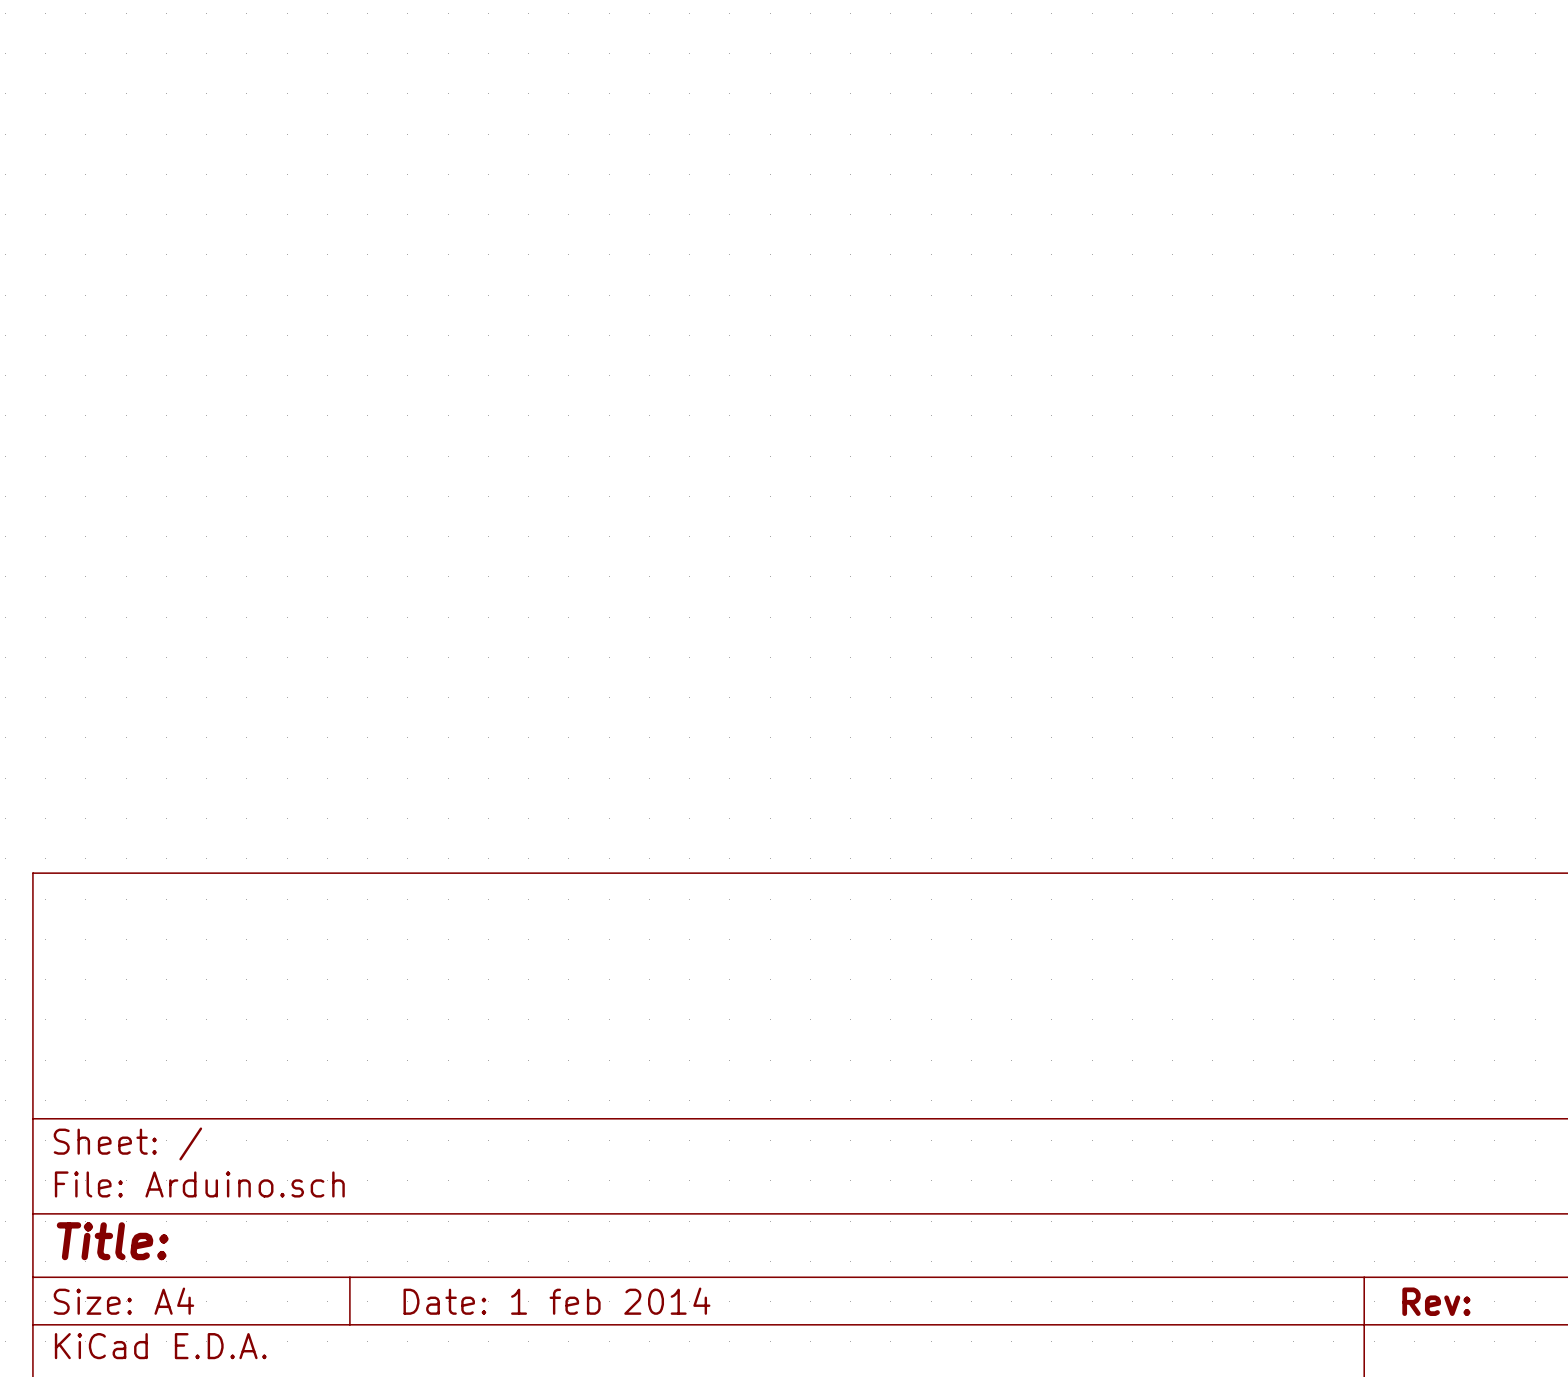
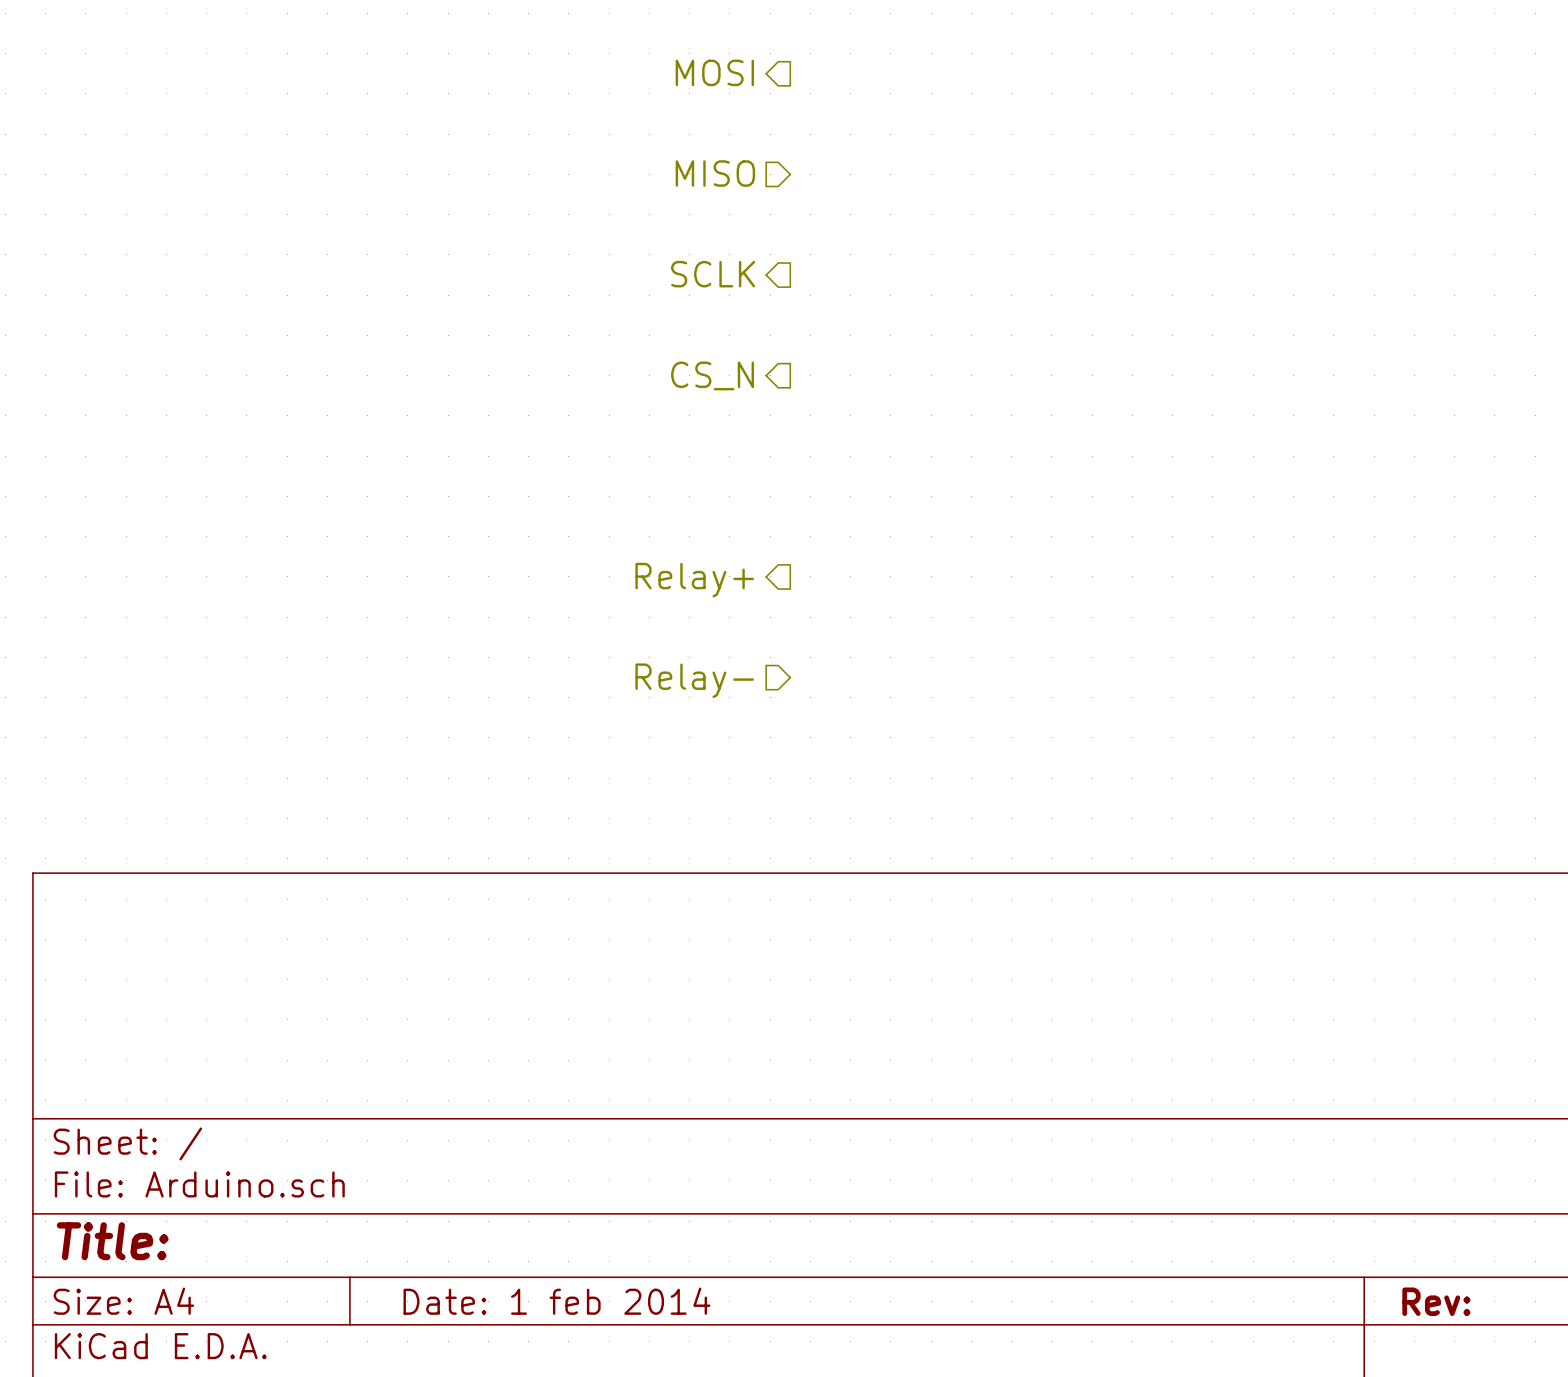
hierarchical label: none -> MOSI (714, 72)
hierarchical label: none -> MISO (715, 173)
hierarchical label: none -> SCLK (713, 274)
hierarchical label: none -> CS_N (712, 375)
hierarchical label: none -> Relay+ (694, 580)
hierarchical label: none -> Relay- (694, 680)

